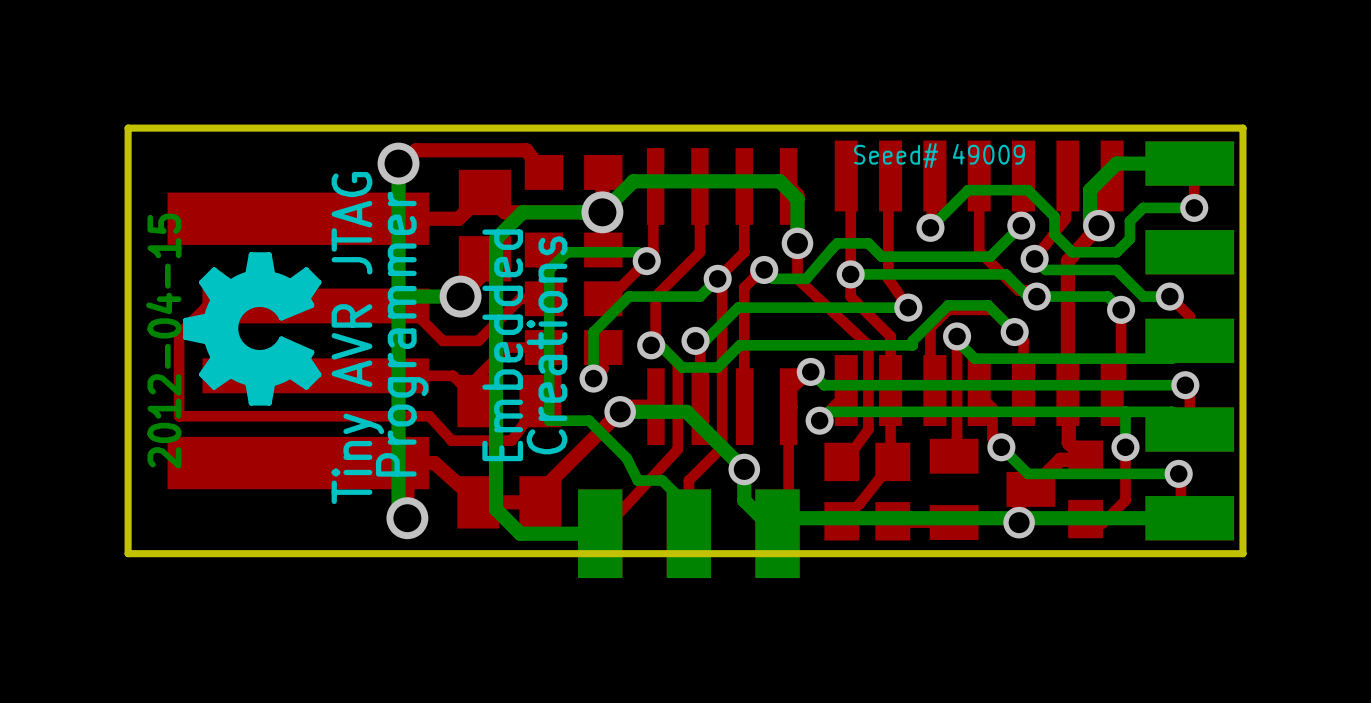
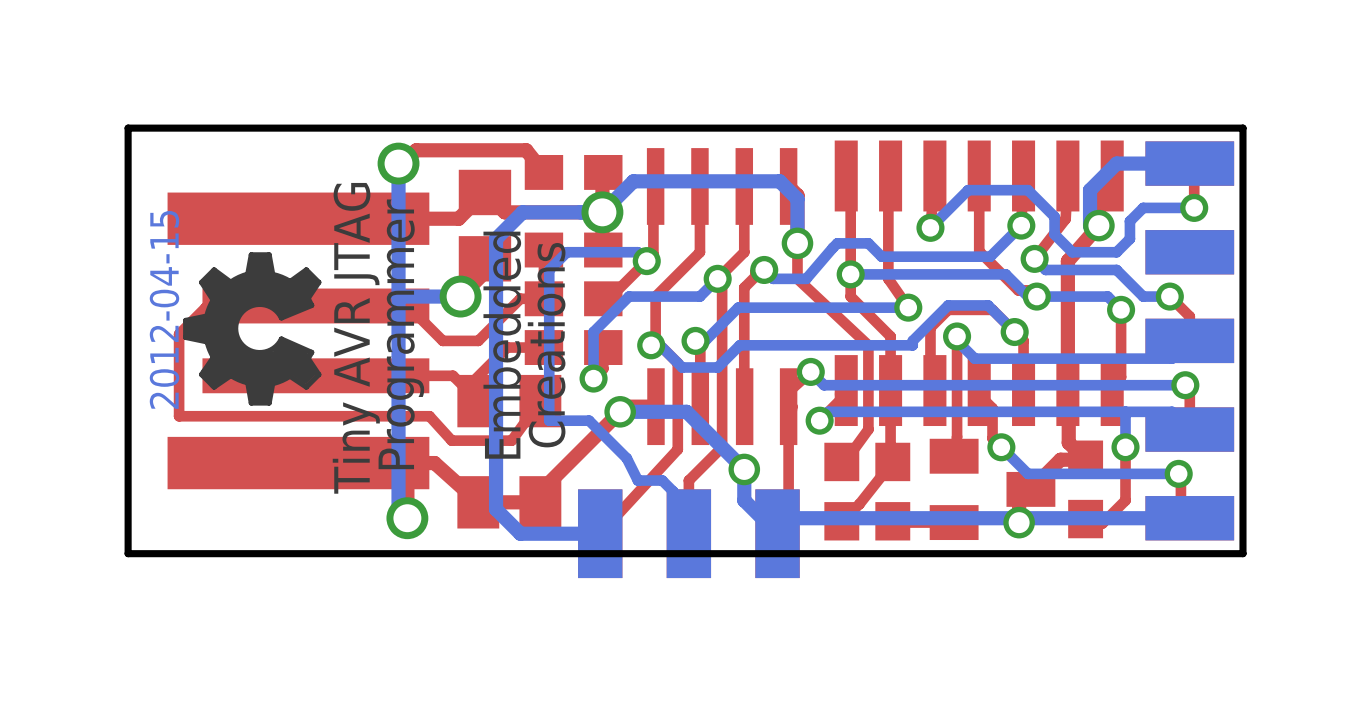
text: Seeed# 49009 (939, 155) -> none

